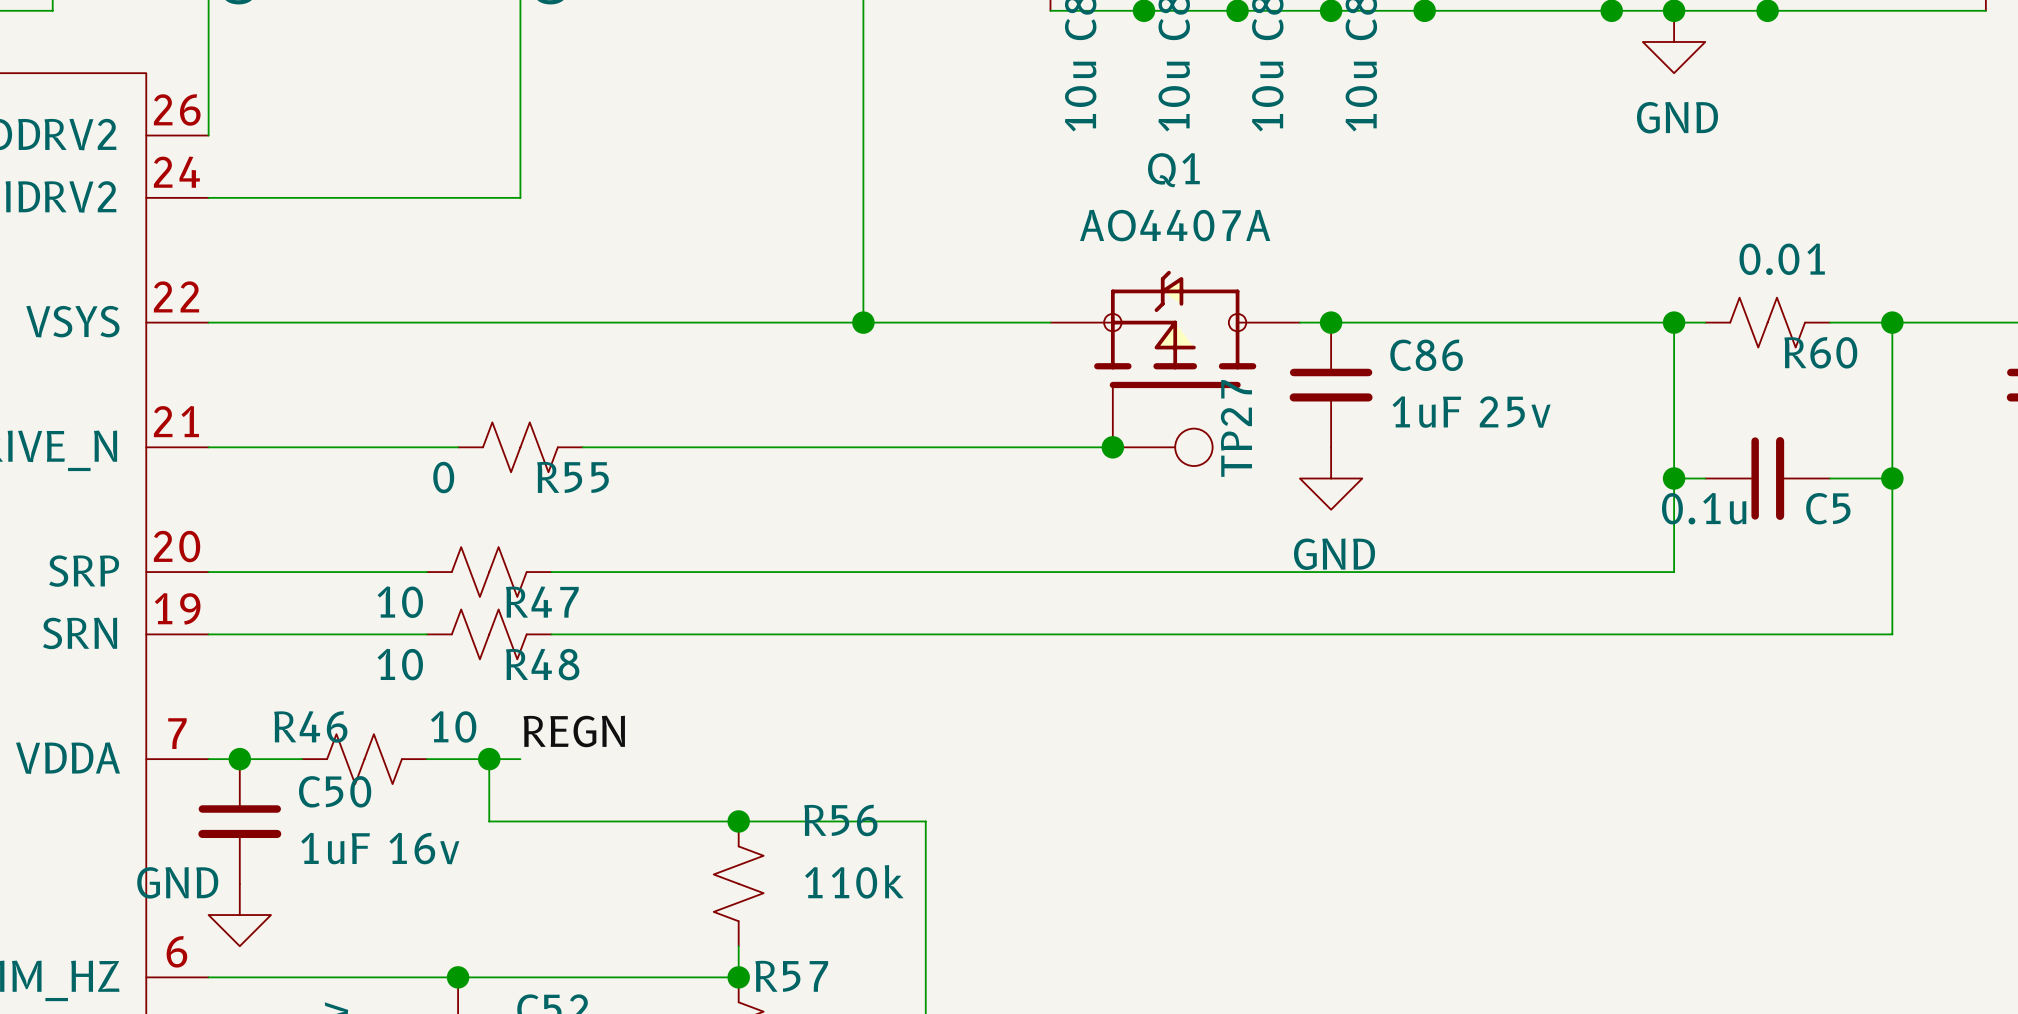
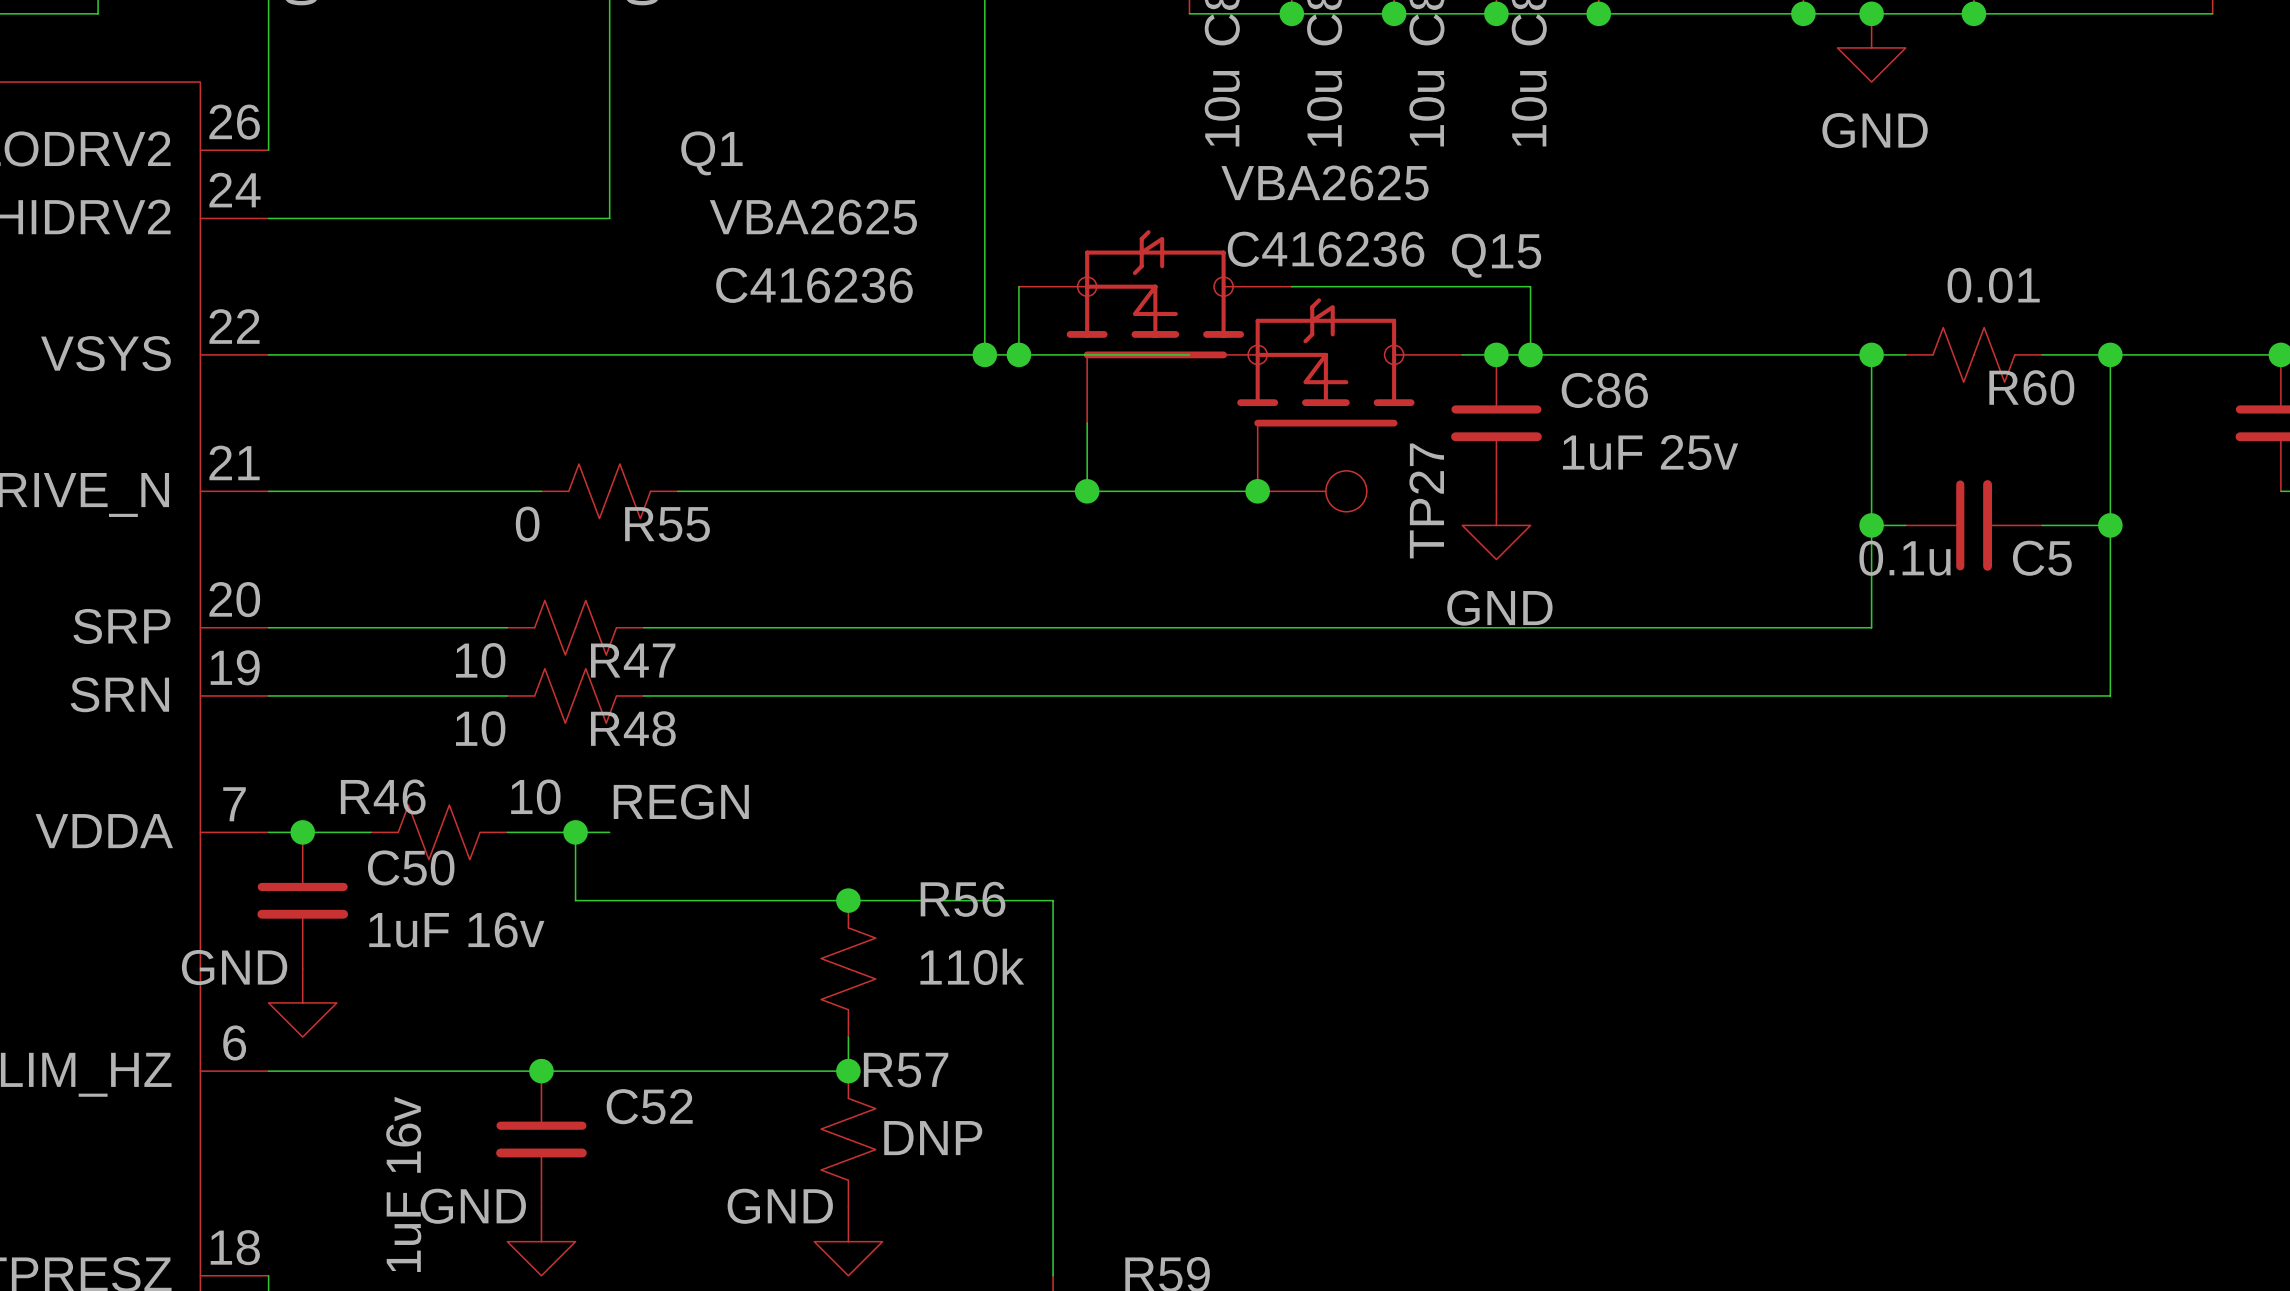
Q1 name: Q1 (1173, 170) -> Q15 (1496, 255)
Q1 value: AO4407A (1175, 225) -> VBA2625 (1324, 183)
Q1 text: none -> C416236 (1326, 249)
wire: none -> (1018, 286) (1018, 354)
wire: none -> (1291, 286) (1530, 286) (1530, 354)
Q1: none -> VBA2625 (1155, 326)
junction: none -> (1018, 354)
junction: none -> (1530, 354)
wire: none -> (1087, 423) (1087, 491)
TP27 name position: TP27 (1236, 428) -> TP27 (1426, 500)
junction: none -> (1087, 491)

